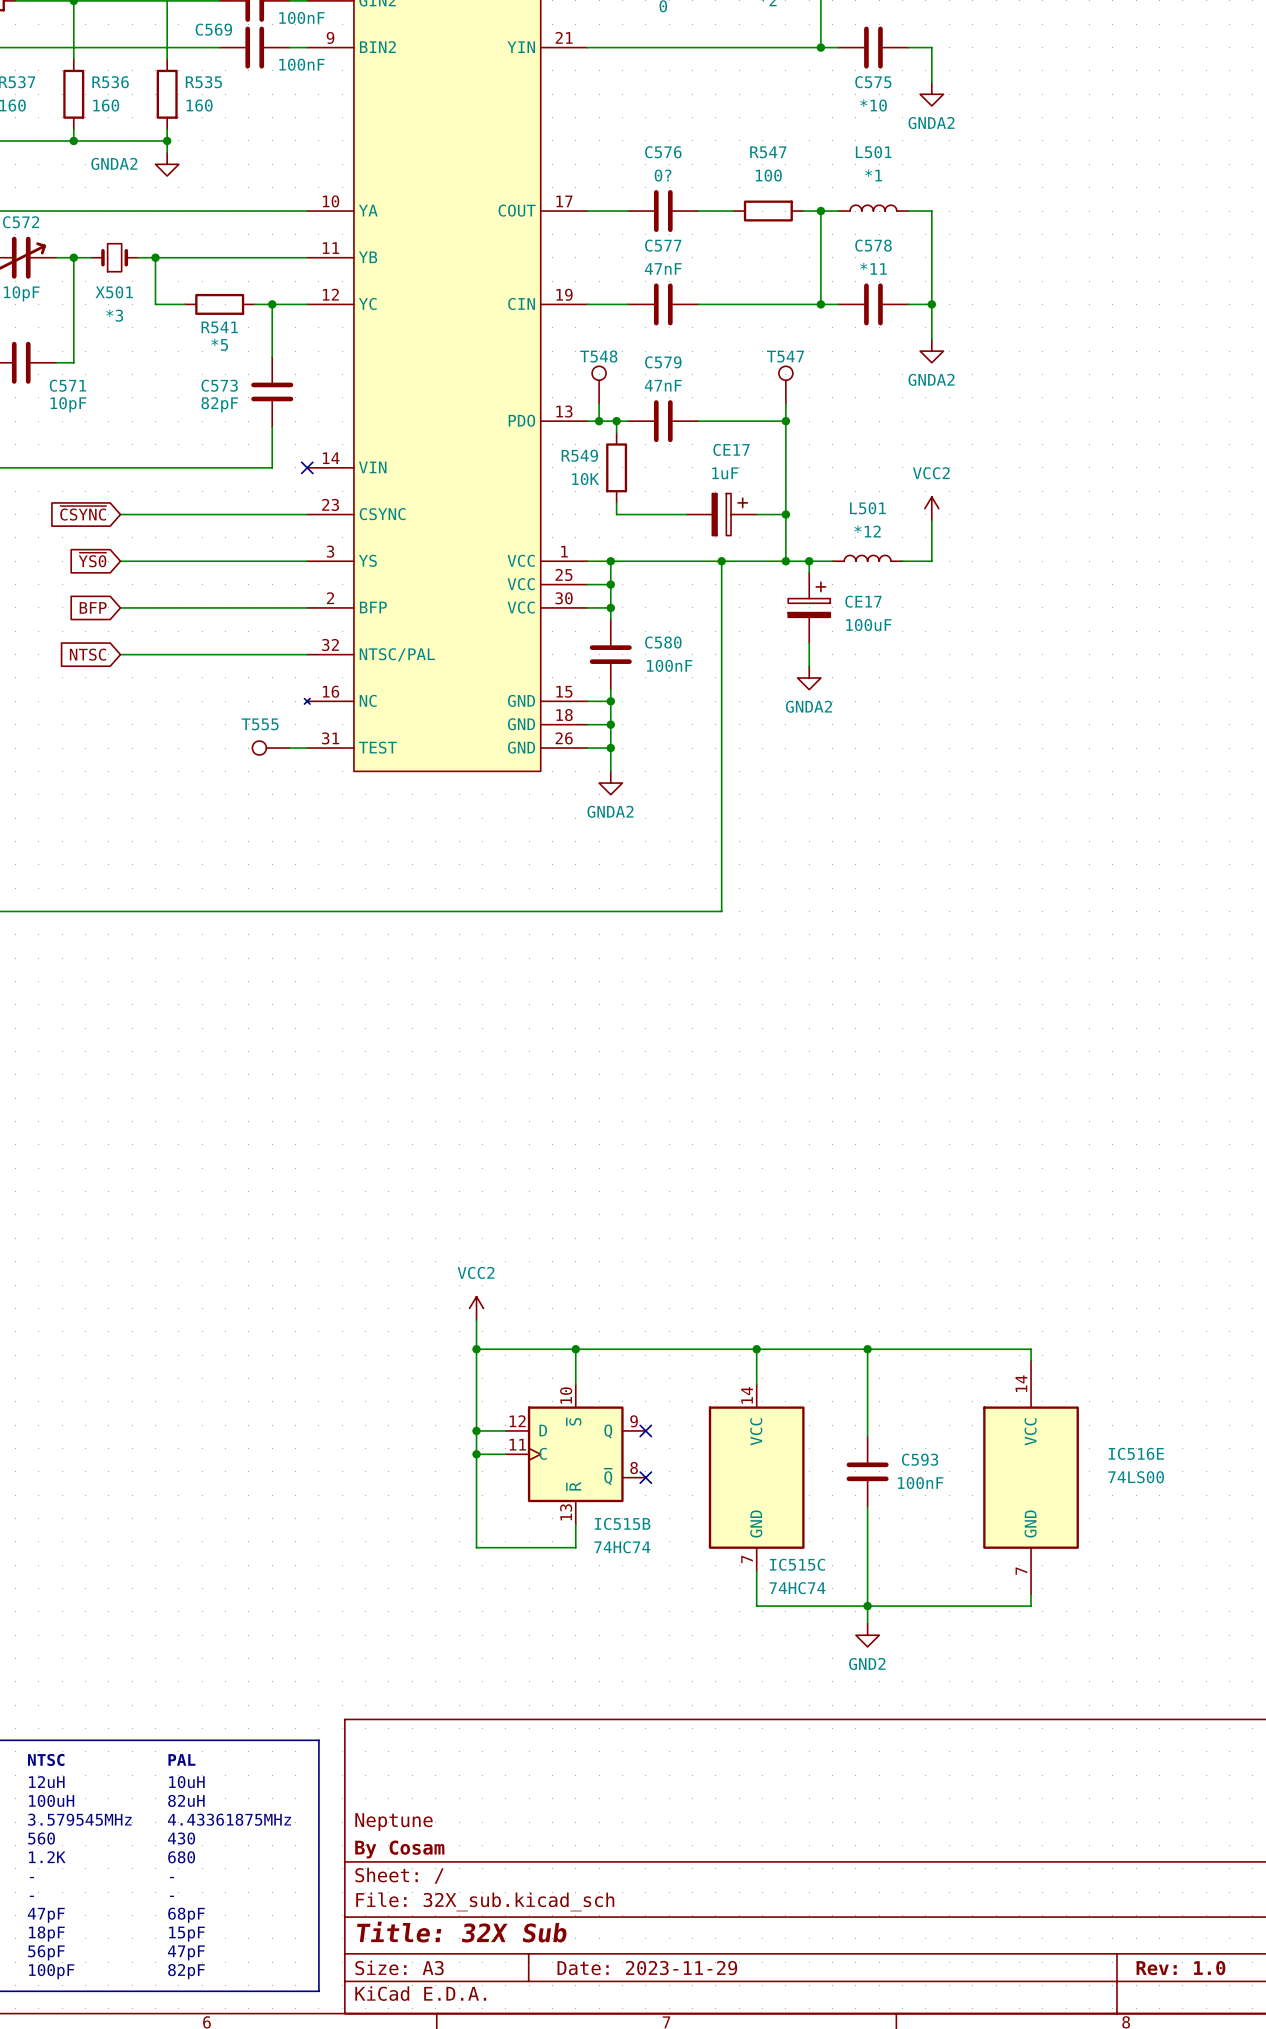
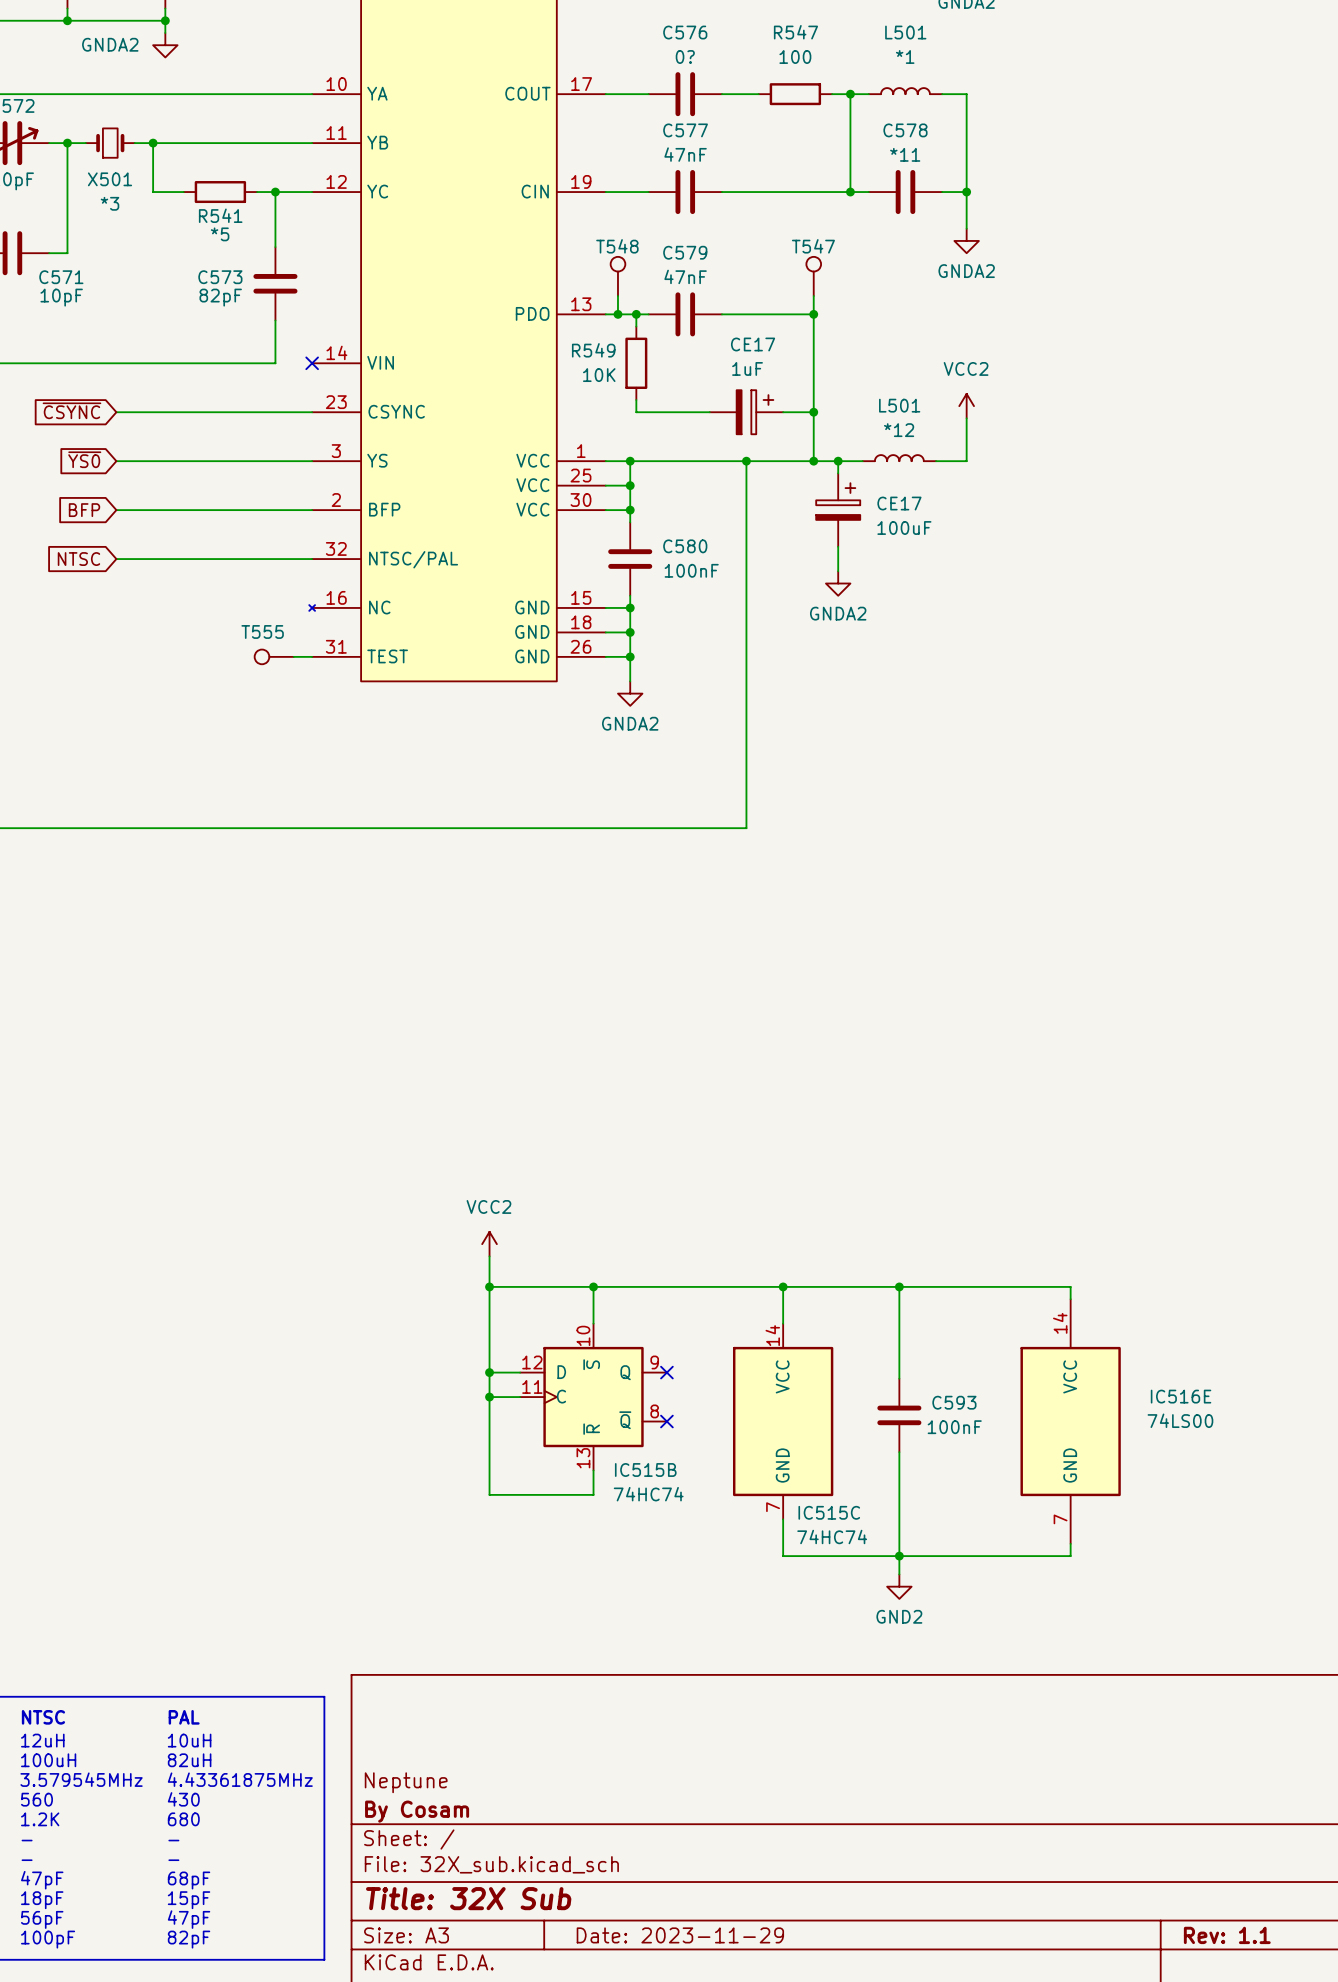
title block: Rev: 1.0 (1180, 1968) -> Rev: 1.1 (1227, 1935)

